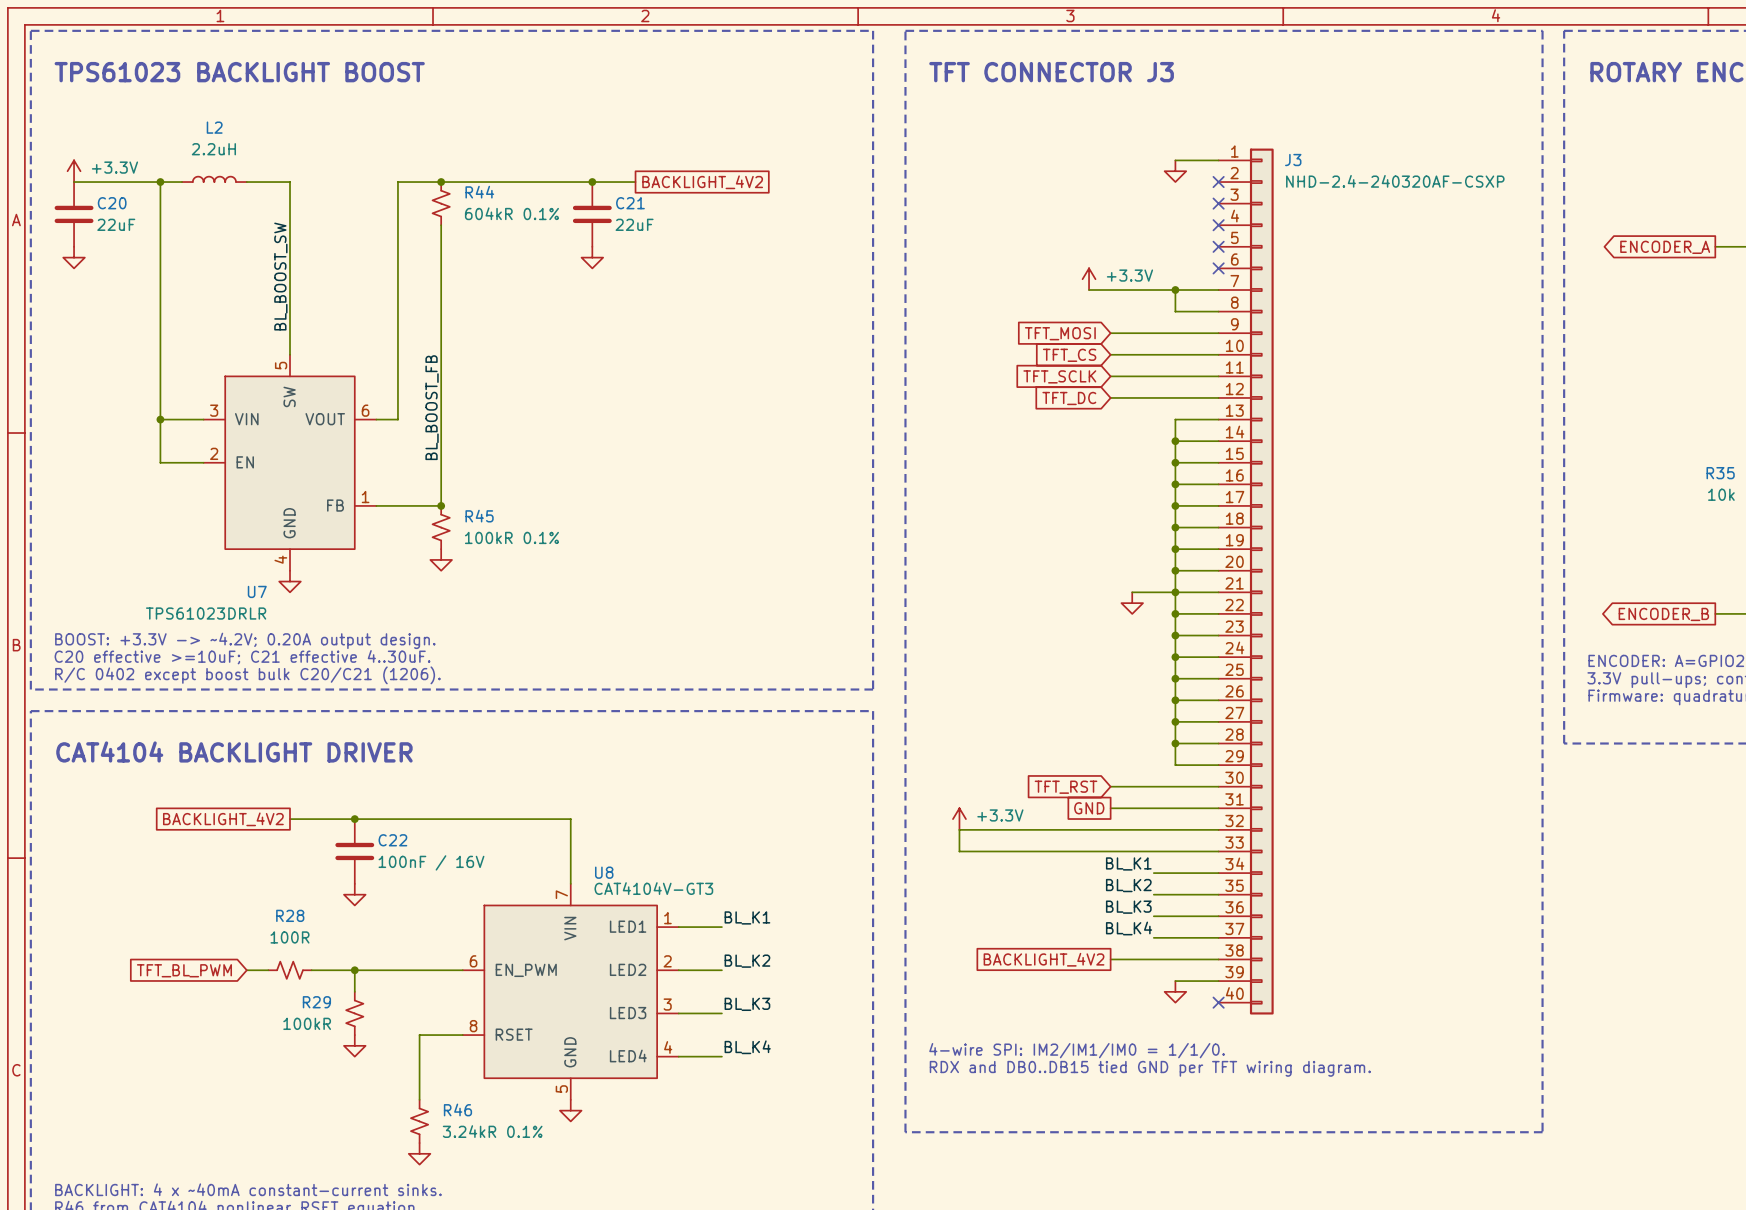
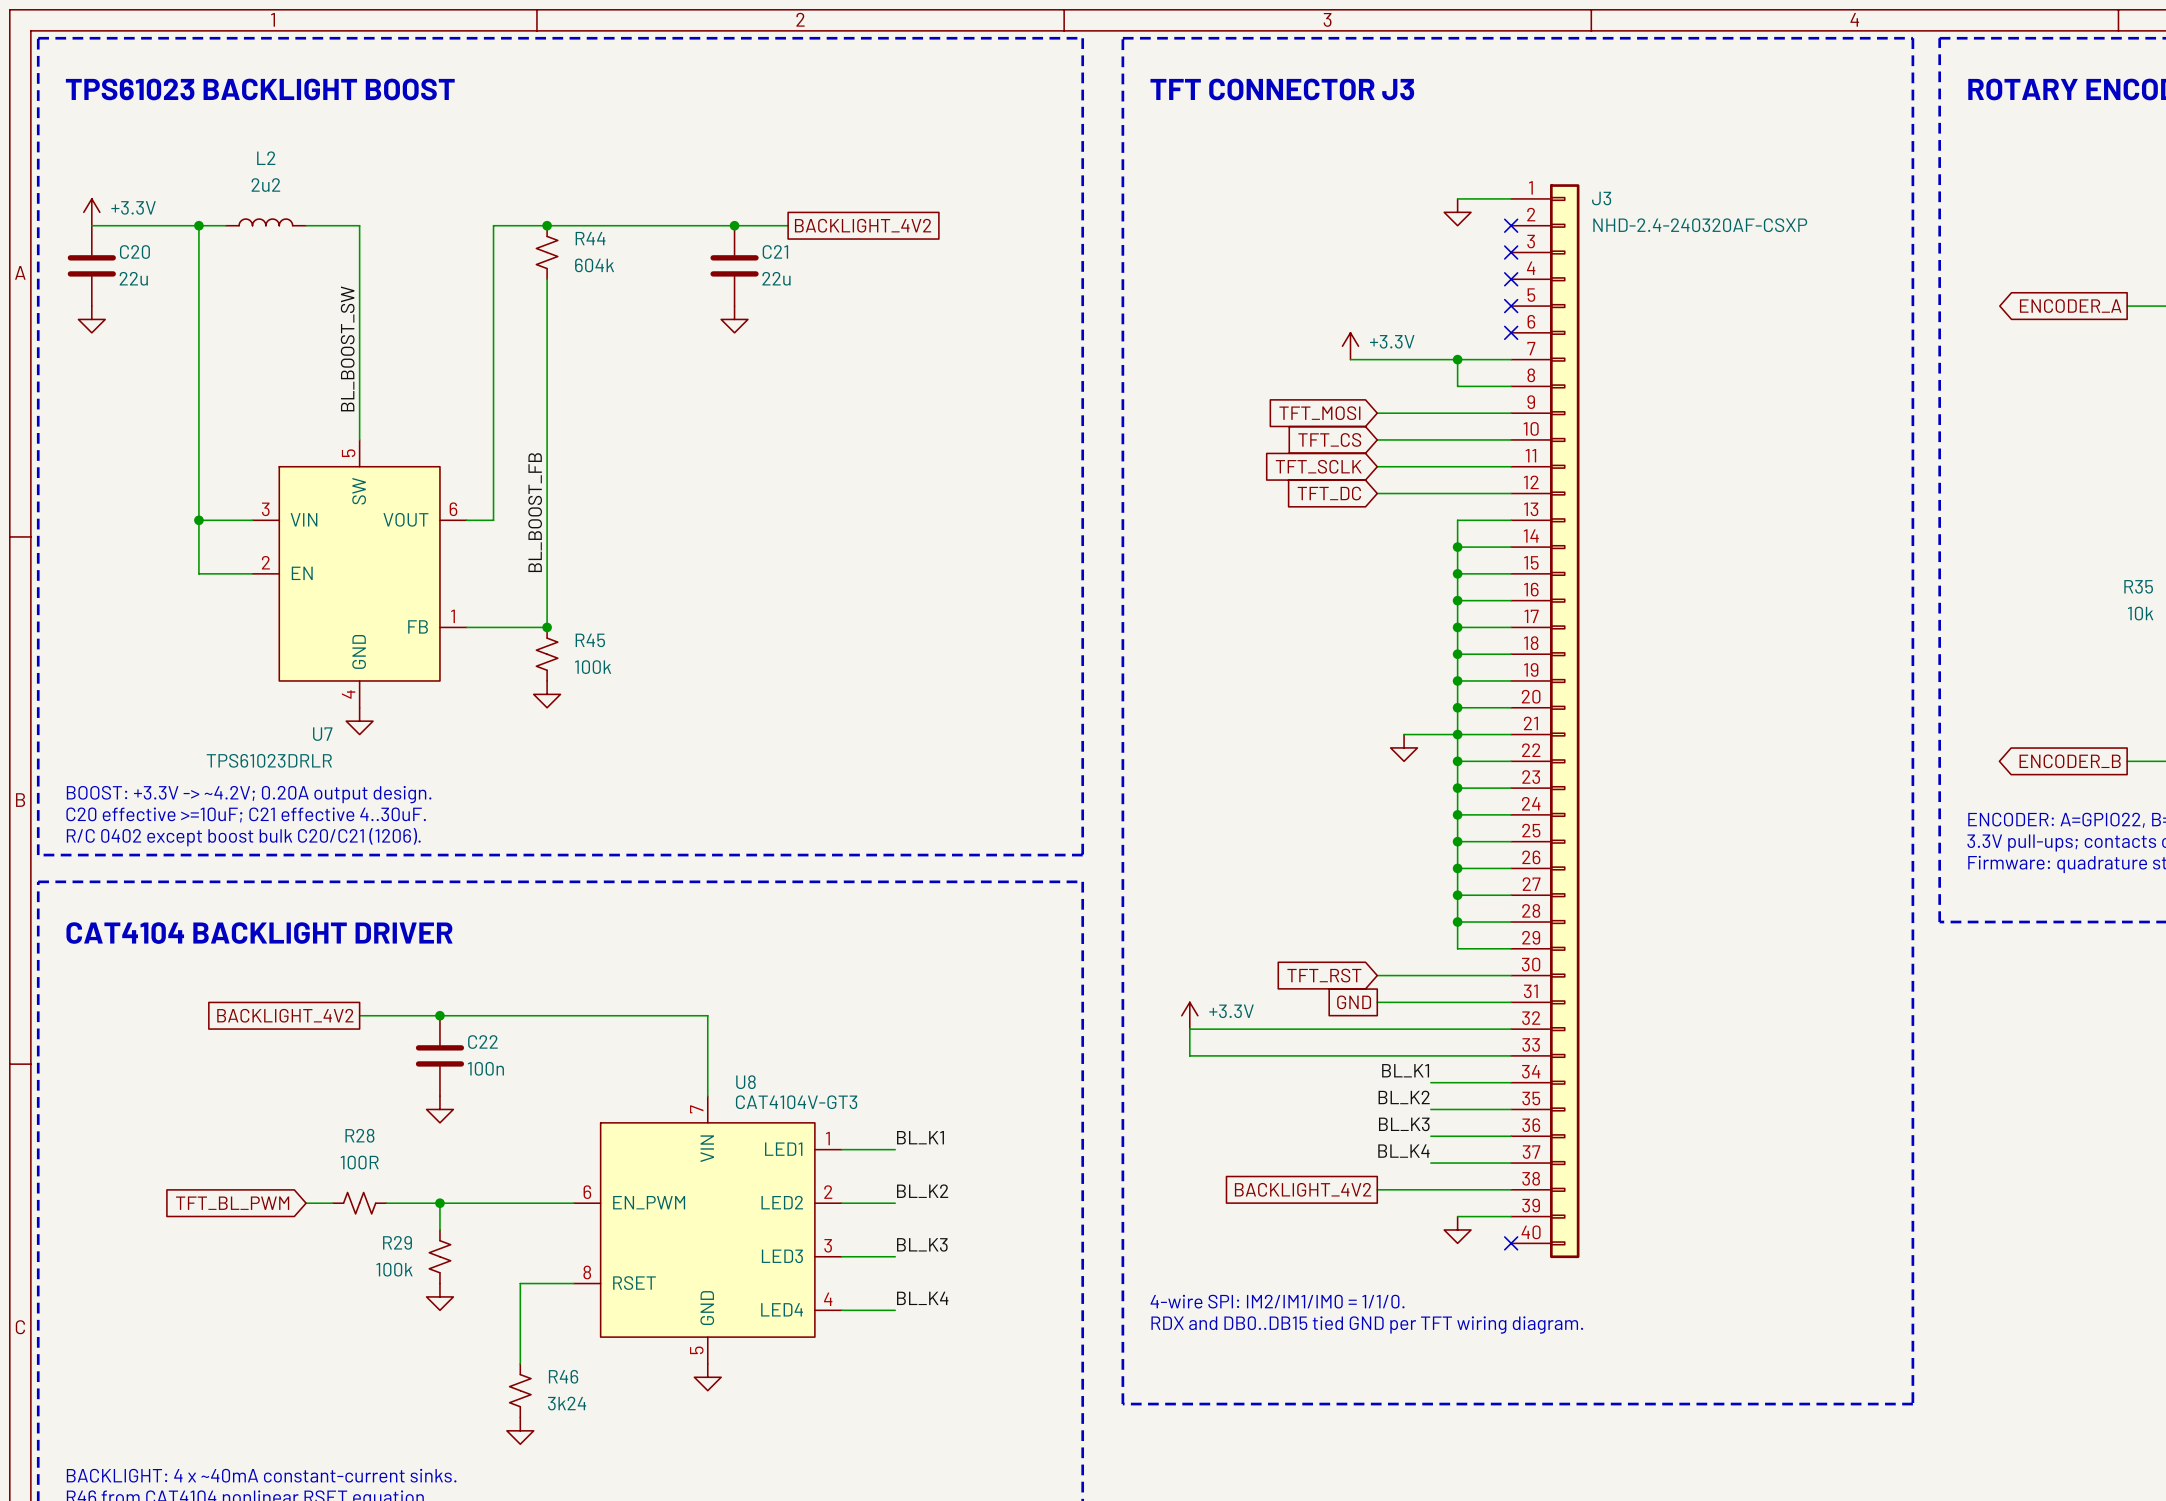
L2 value: 2.2uH (213, 149) -> 2u2 (265, 185)
R44 value: 604kR 0.1% (511, 213) -> 604k (594, 265)
C20 value: 22uF (116, 224) -> 22u (133, 278)
C21 value: 22uF (634, 224) -> 22u (776, 278)
R45 value: 100kR 0.1% (511, 537) -> 100k (593, 667)
C22 value: 100nF / 16V (431, 862) -> 100n (485, 1068)
R29 value: 100kR (307, 1023) -> 100k (394, 1269)
R46 value: 3.24kR 0.1% (492, 1131) -> 3k24 (567, 1403)

